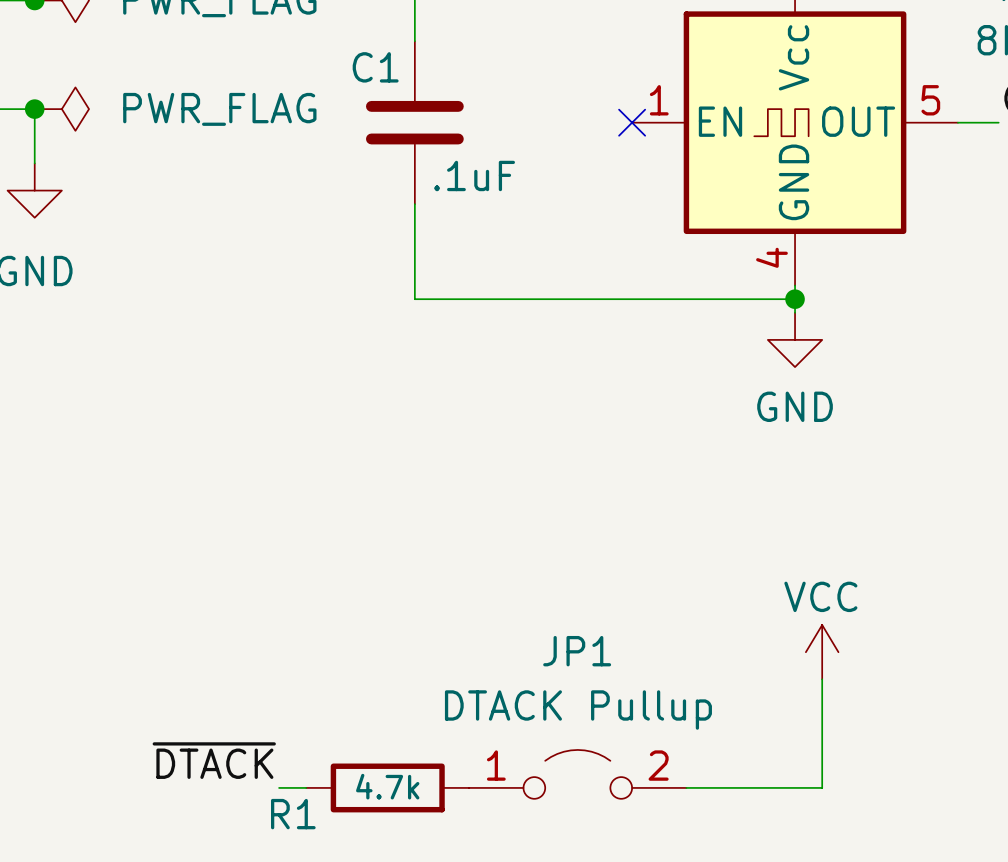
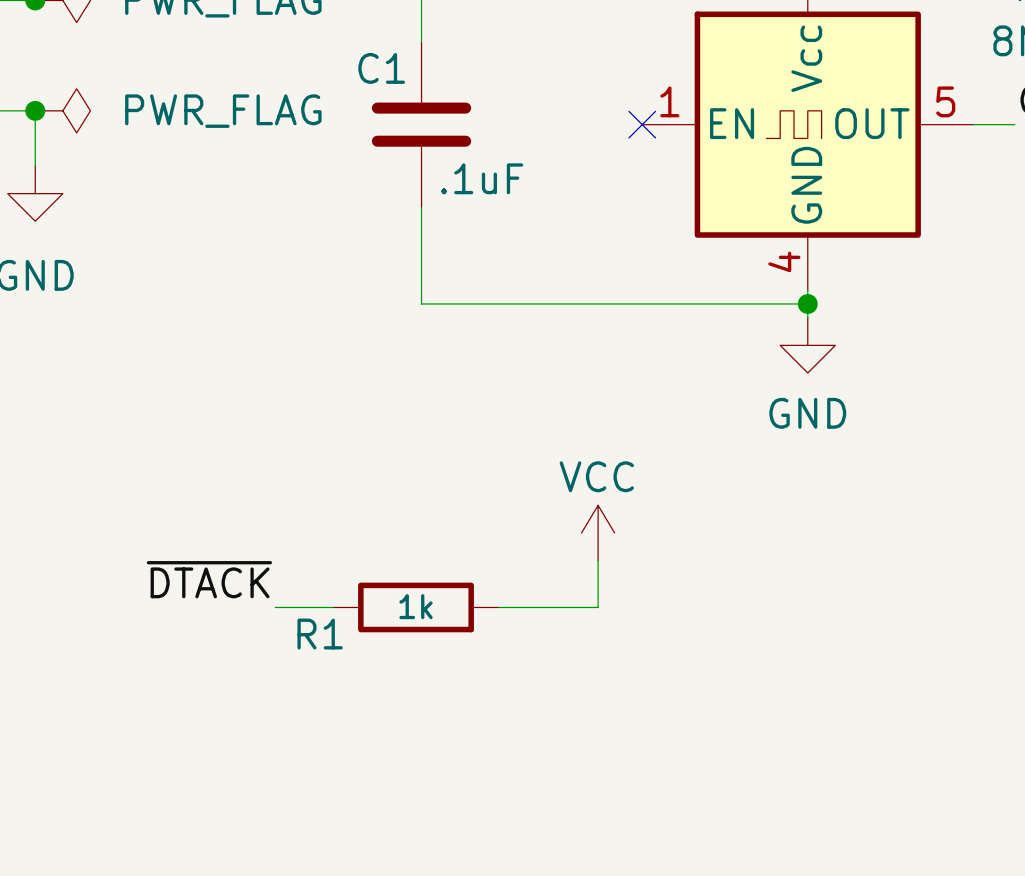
wire: none -> (598, 560) (598, 607) (498, 607)
wire: none -> (275, 607) (333, 607)
power symbol position: VCC (822, 652) -> VCC (598, 532)
wire: (822, 679) (822, 787) (686, 787) -> none
label position: ~{DTACK} (214, 760) -> ~{DTACK} (209, 579)
JP1: DTACK Pullup (577, 774) -> none
R1 value: 4.7k (387, 786) -> 1k (416, 606)
wire: (279, 787) (306, 787) -> none
R1 position: (387, 787) -> (416, 607)

